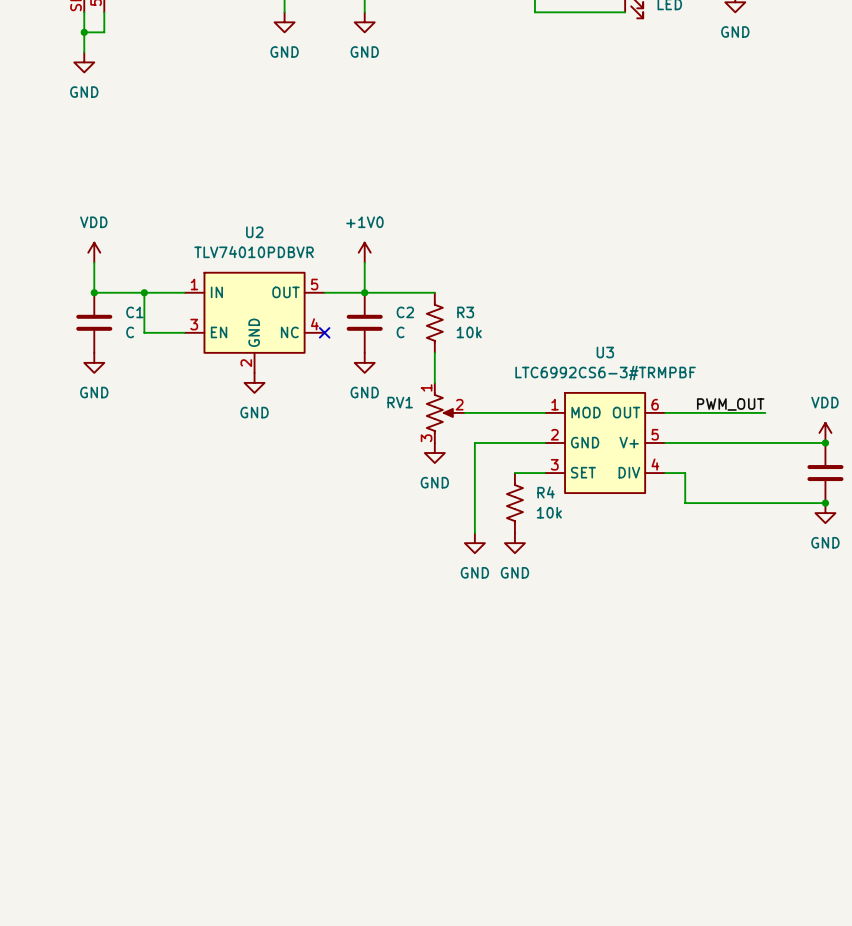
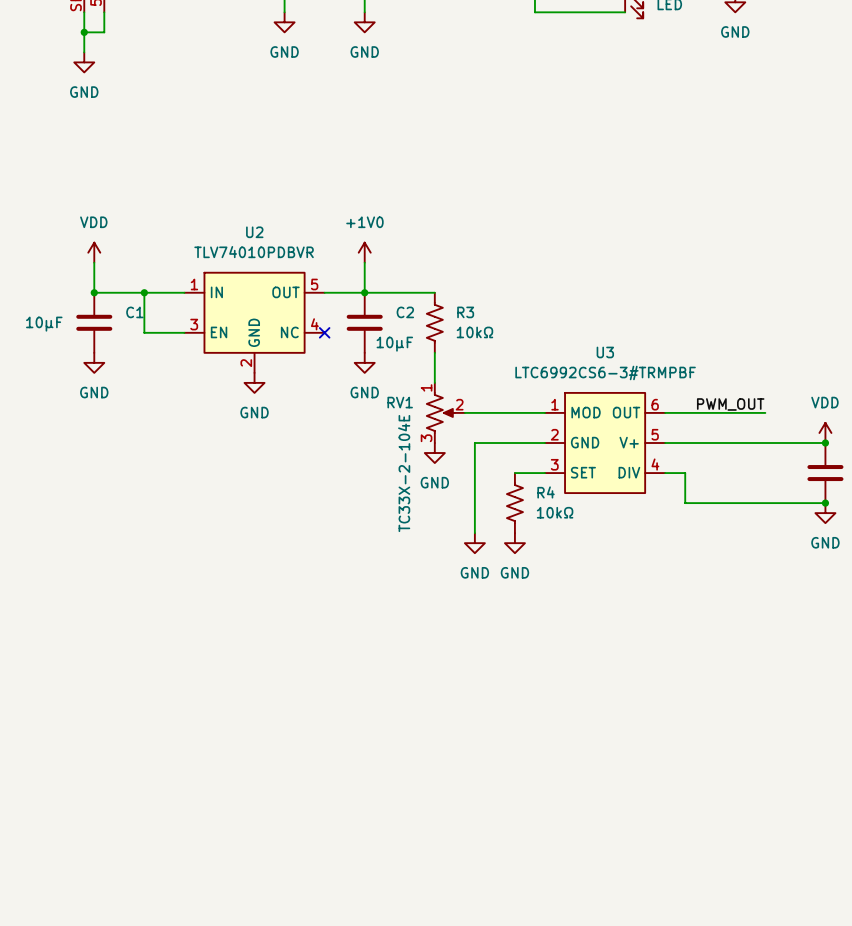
C1 value: C (130, 332) -> 10µF (44, 324)
C2 value: C (400, 332) -> 10µF (394, 344)
R3 value: 10k (469, 332) -> 10kΩ (474, 332)
RV1 text: none -> TC33X-2-104E (404, 473)
R4 value: 10k (549, 512) -> 10kΩ (555, 512)

